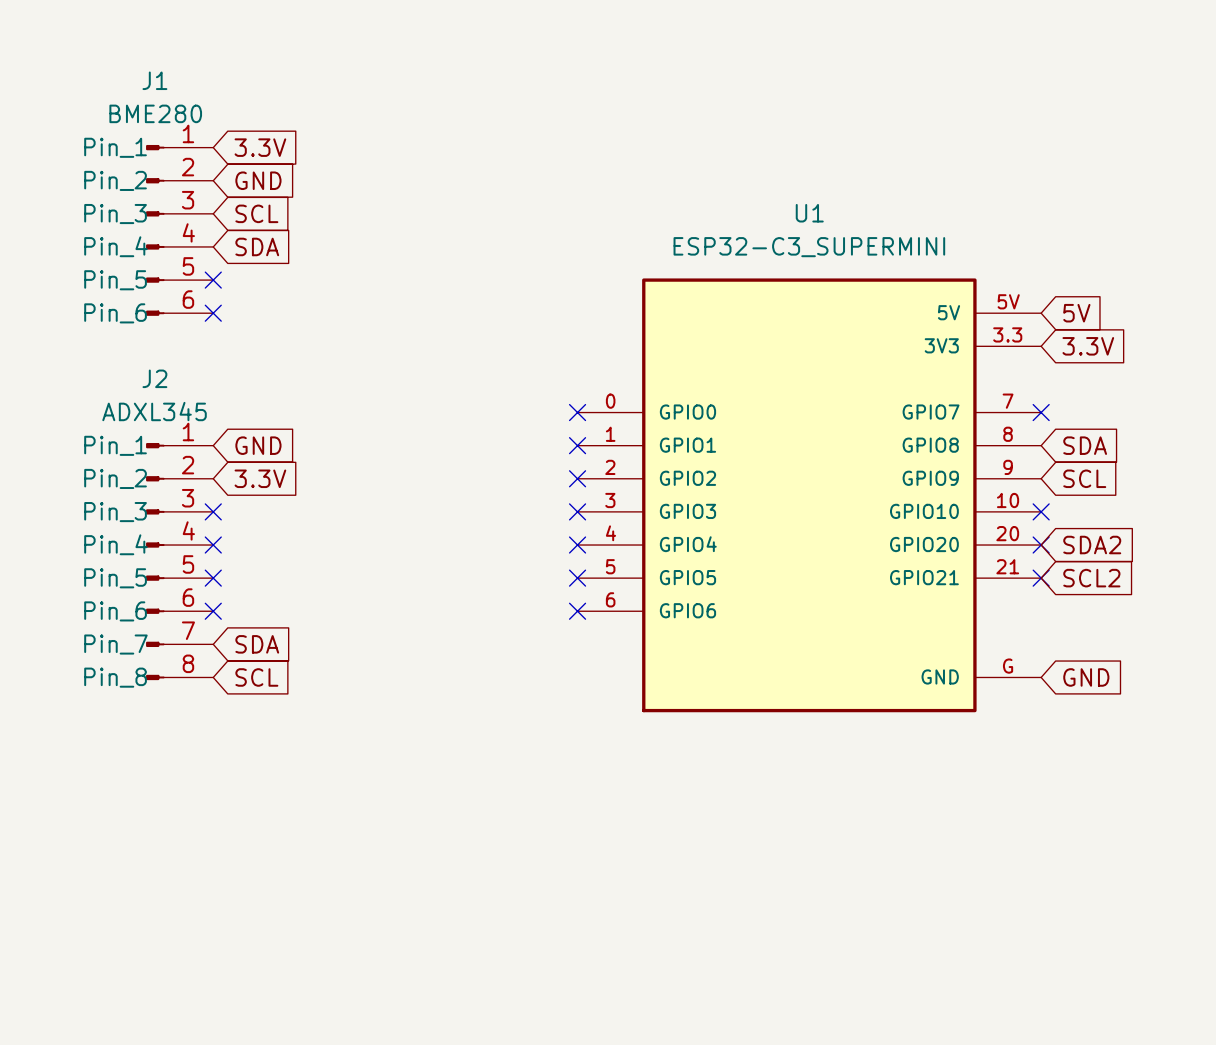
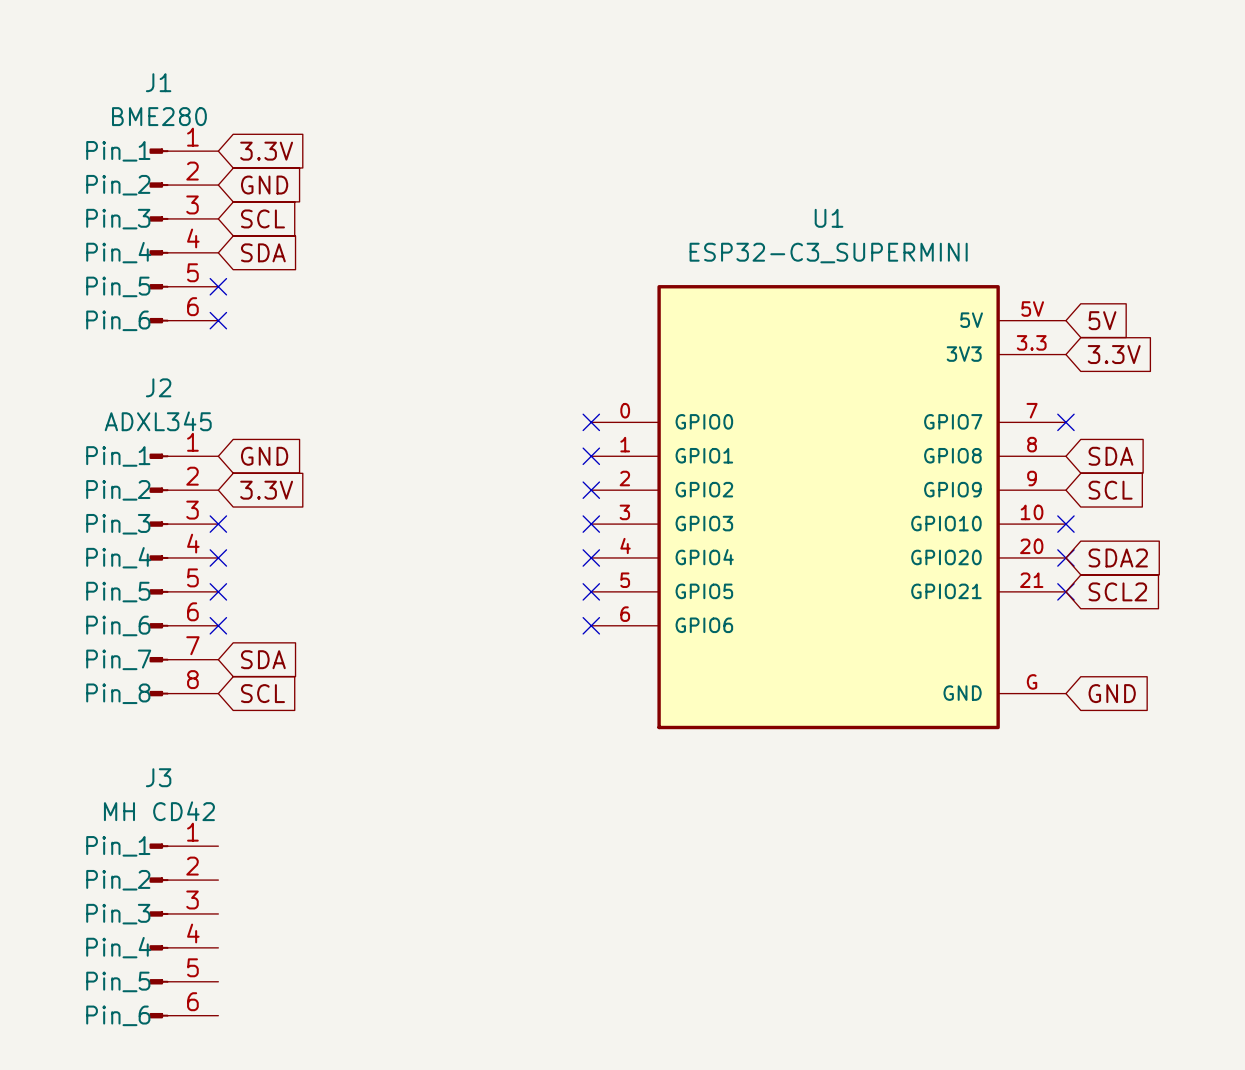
J3: none -> MH CD42 (183, 930)

